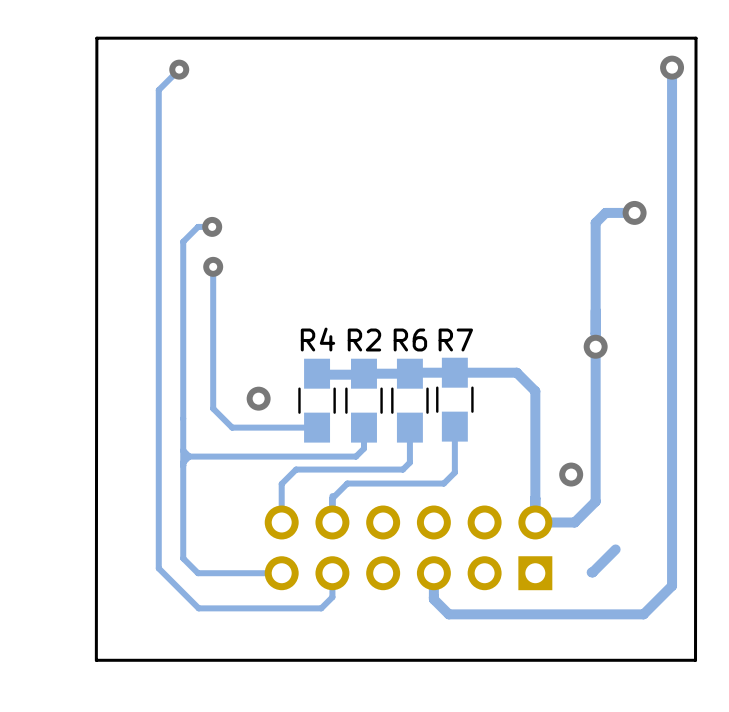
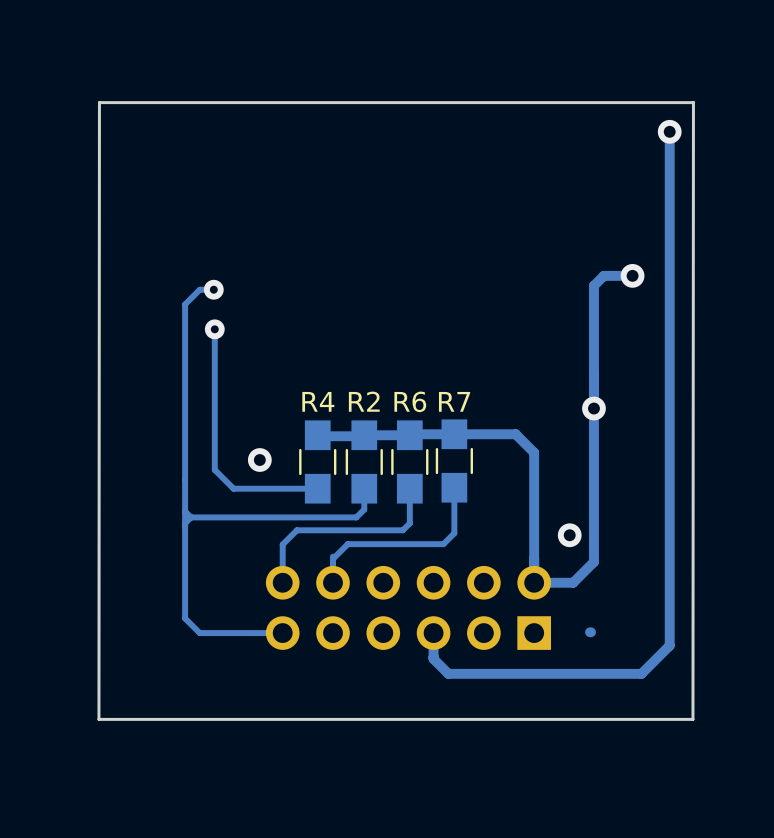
track: (179, 69) (158, 90) (158, 568) (198, 608) (321, 608) (332, 597) (332, 573) -> none
via: (179, 69) -> none
track: (615, 549) (592, 572) -> none

